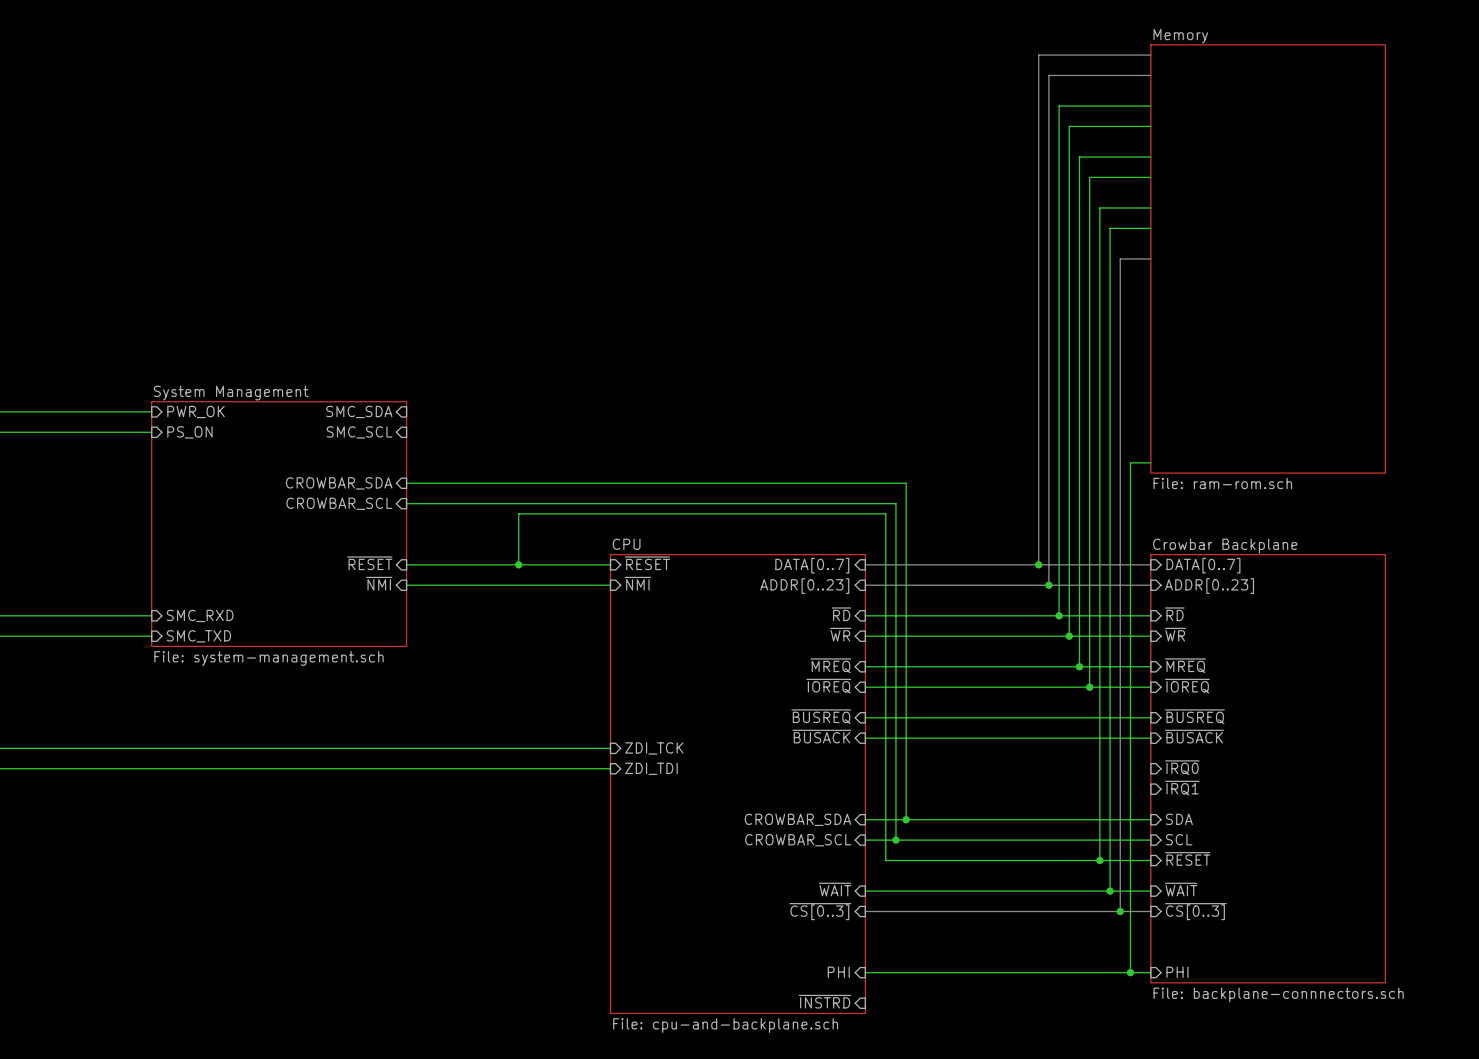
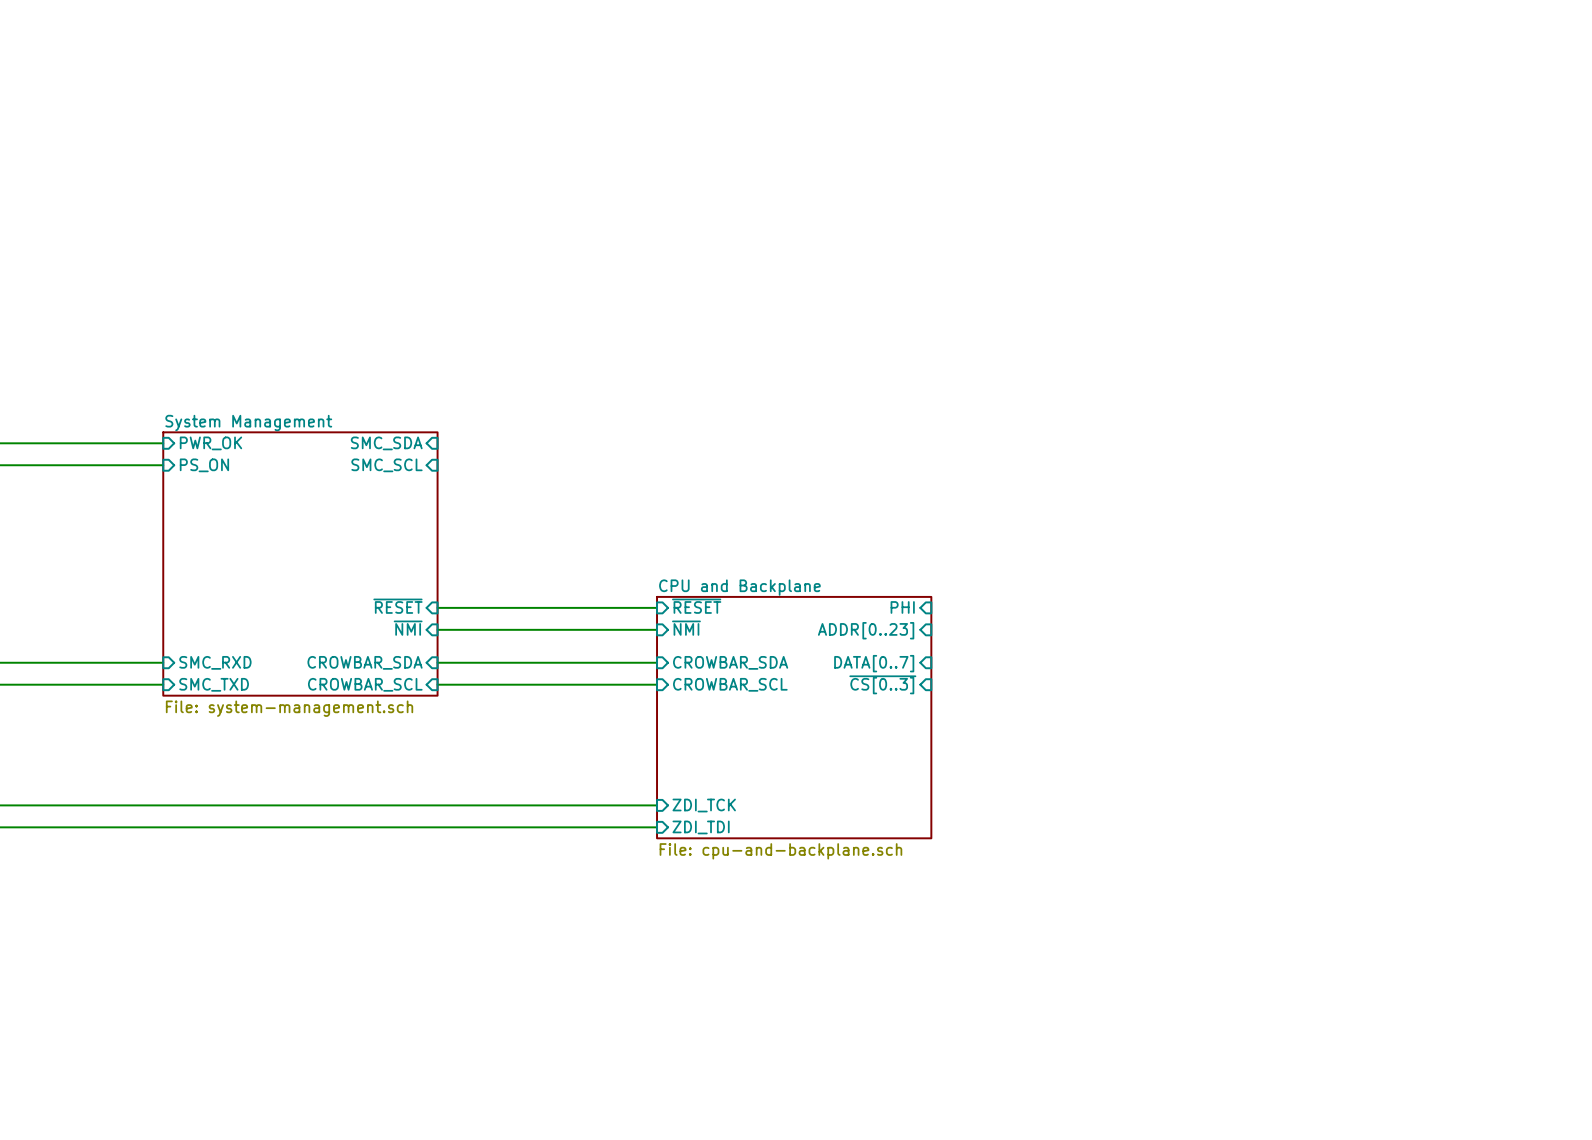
bus: (1150, 55) (1038, 55) (1038, 564) -> none
bus: (1150, 75) (1048, 75) (1048, 585) -> none
wire: (1150, 106) (1059, 106) (1059, 615) -> none
wire: (1150, 126) (1069, 126) (1069, 636) -> none
wire: (1150, 157) (1079, 157) (1079, 666) -> none
wire: (1150, 177) (1089, 177) (1089, 687) -> none
wire: (1150, 207) (1099, 207) (1099, 860) -> none
wire: (1150, 228) (1110, 228) (1110, 891) -> none
bus: (1150, 258) (1120, 258) (1120, 911) -> none
sheet Memory: File: ram-rom.sch (1268, 258) -> none
wire: (1150, 462) (1130, 462) (1130, 972) -> none
sheet pin position: CROWBAR_SDA (339, 483) -> CROWBAR_SDA (365, 662)
wire: (406, 483) (906, 483) (906, 819) -> none
sheet pin position: CROWBAR_SCL (339, 503) -> CROWBAR_SCL (365, 684)
wire: (406, 503) (895, 503) (895, 840) -> none
wire: (518, 564) (518, 513) (885, 513) (885, 860) (1150, 860) -> none
junction: (518, 564) -> none
bus: (865, 564) (1150, 564) -> none
junction: (1038, 564) -> none
sheet pin: DATA[0..7] (812, 565) -> PHI (902, 607)
sheet pin: DATA[0..7] (1203, 565) -> none
bus: (865, 585) (1150, 585) -> none
junction: (1048, 585) -> none
sheet pin: ADDR[0..23] (1209, 586) -> none
sheet pin: ~{RD} (841, 614) -> DATA[0..7] (874, 663)
sheet pin: ~{RD} (1174, 614) -> none
wire: none -> (437, 662) (657, 662)
sheet pin: none -> CROWBAR_SDA (730, 662)
wire: (865, 615) (1150, 615) -> none
junction: (1059, 615) -> none
sheet pin: ~{WR} (840, 634) -> ~{CS[0..3]} (882, 684)
sheet pin: ~{WR} (1175, 634) -> none
wire: none -> (437, 684) (657, 684)
sheet pin: none -> CROWBAR_SCL (730, 684)
wire: (865, 636) (1150, 636) -> none
junction: (1069, 636) -> none
sheet pin: ~{MREQ} (830, 665) -> none
sheet pin: ~{MREQ} (1185, 665) -> none
sheet CPU and Backplane: none -> File: cpu-and-backplane.sch (794, 717)
wire: (865, 666) (1150, 666) -> none
junction: (1079, 666) -> none
sheet pin: ~{IOREQ} (828, 686) -> none
sheet pin: ~{IOREQ} (1187, 686) -> none
wire: (865, 687) (1150, 687) -> none
junction: (1089, 687) -> none
sheet pin: ~{BUSREQ} (821, 716) -> none
sheet pin: ~{BUSREQ} (1194, 716) -> none
wire: (865, 717) (1150, 717) -> none
sheet pin: ~{BUSACK} (821, 736) -> none
sheet pin: ~{BUSACK} (1194, 736) -> none
wire: (865, 738) (1150, 738) -> none
sheet pin: ~{IRQ0} (1182, 767) -> none
sheet Crowbar Backplane: File: backplane-connnectors.sch (1268, 768) -> none
sheet CPU: File: cpu-and-backplane.sch (737, 784) -> none
sheet pin: ~{IRQ1} (1182, 788) -> none
sheet pin: CROWBAR_SDA (797, 819) -> none
wire: (865, 819) (1150, 819) -> none
junction: (906, 819) -> none
sheet pin: SDA (1179, 819) -> none
sheet pin: SCL (1179, 839) -> none
sheet pin: CROWBAR_SCL (798, 840) -> none
wire: (865, 840) (1150, 840) -> none
junction: (895, 840) -> none
sheet pin: ~{RESET} (1187, 858) -> none
junction: (1099, 860) -> none
sheet pin: ~{WAIT} (835, 889) -> none
sheet pin: ~{WAIT} (1181, 889) -> none
wire: (865, 891) (1150, 891) -> none
junction: (1110, 891) -> none
sheet pin: ~{CS[0..3]} (820, 911) -> none
bus: (865, 911) (1150, 911) -> none
junction: (1120, 911) -> none
sheet pin: ~{CS[0..3]} (1195, 911) -> none
sheet pin: PHI (838, 972) -> none
wire: (865, 972) (1150, 972) -> none
junction: (1130, 972) -> none
sheet pin: PHI (1177, 972) -> none
sheet pin: ~{INSTRD} (824, 1001) -> none

